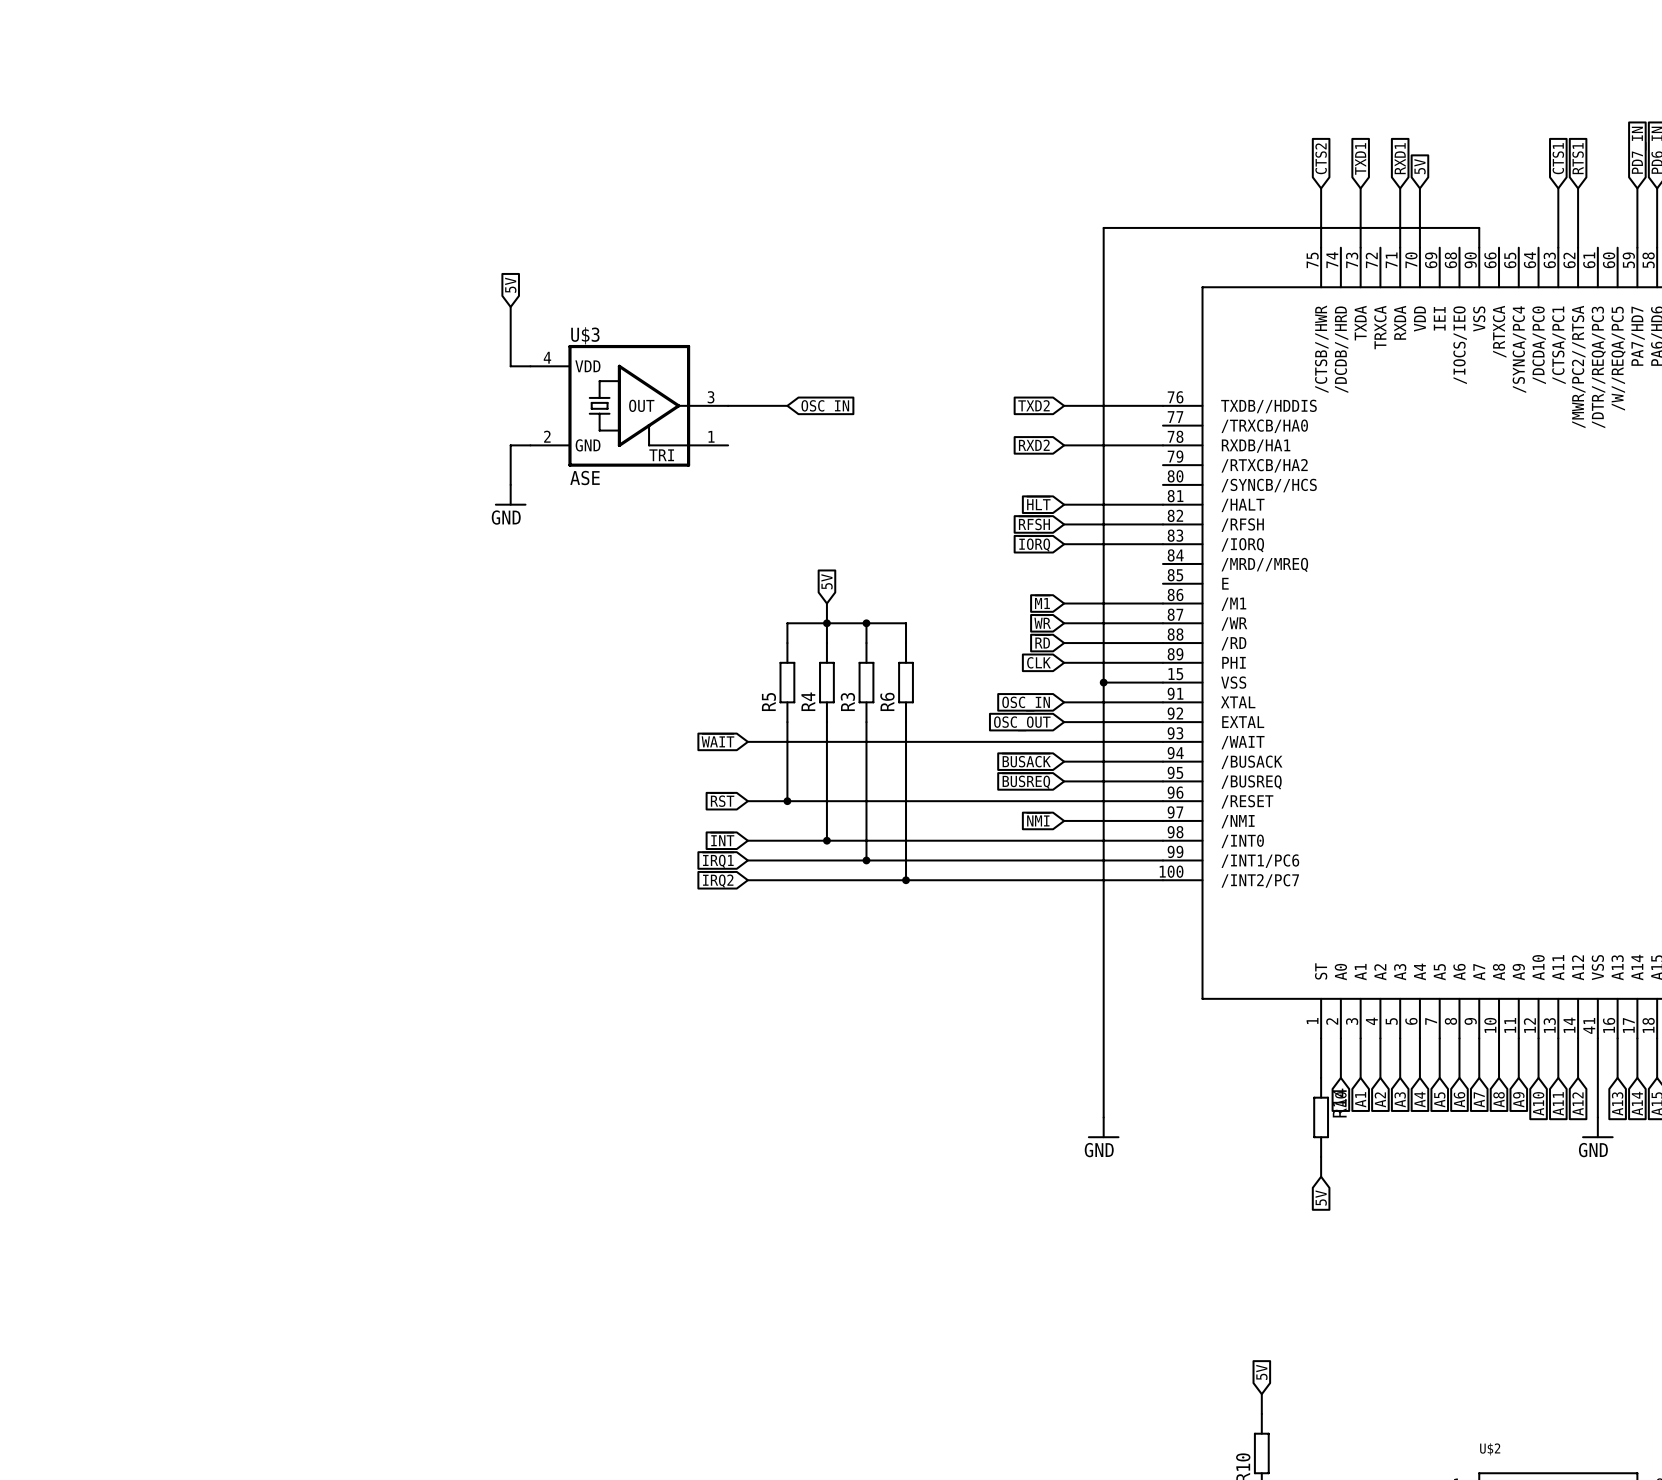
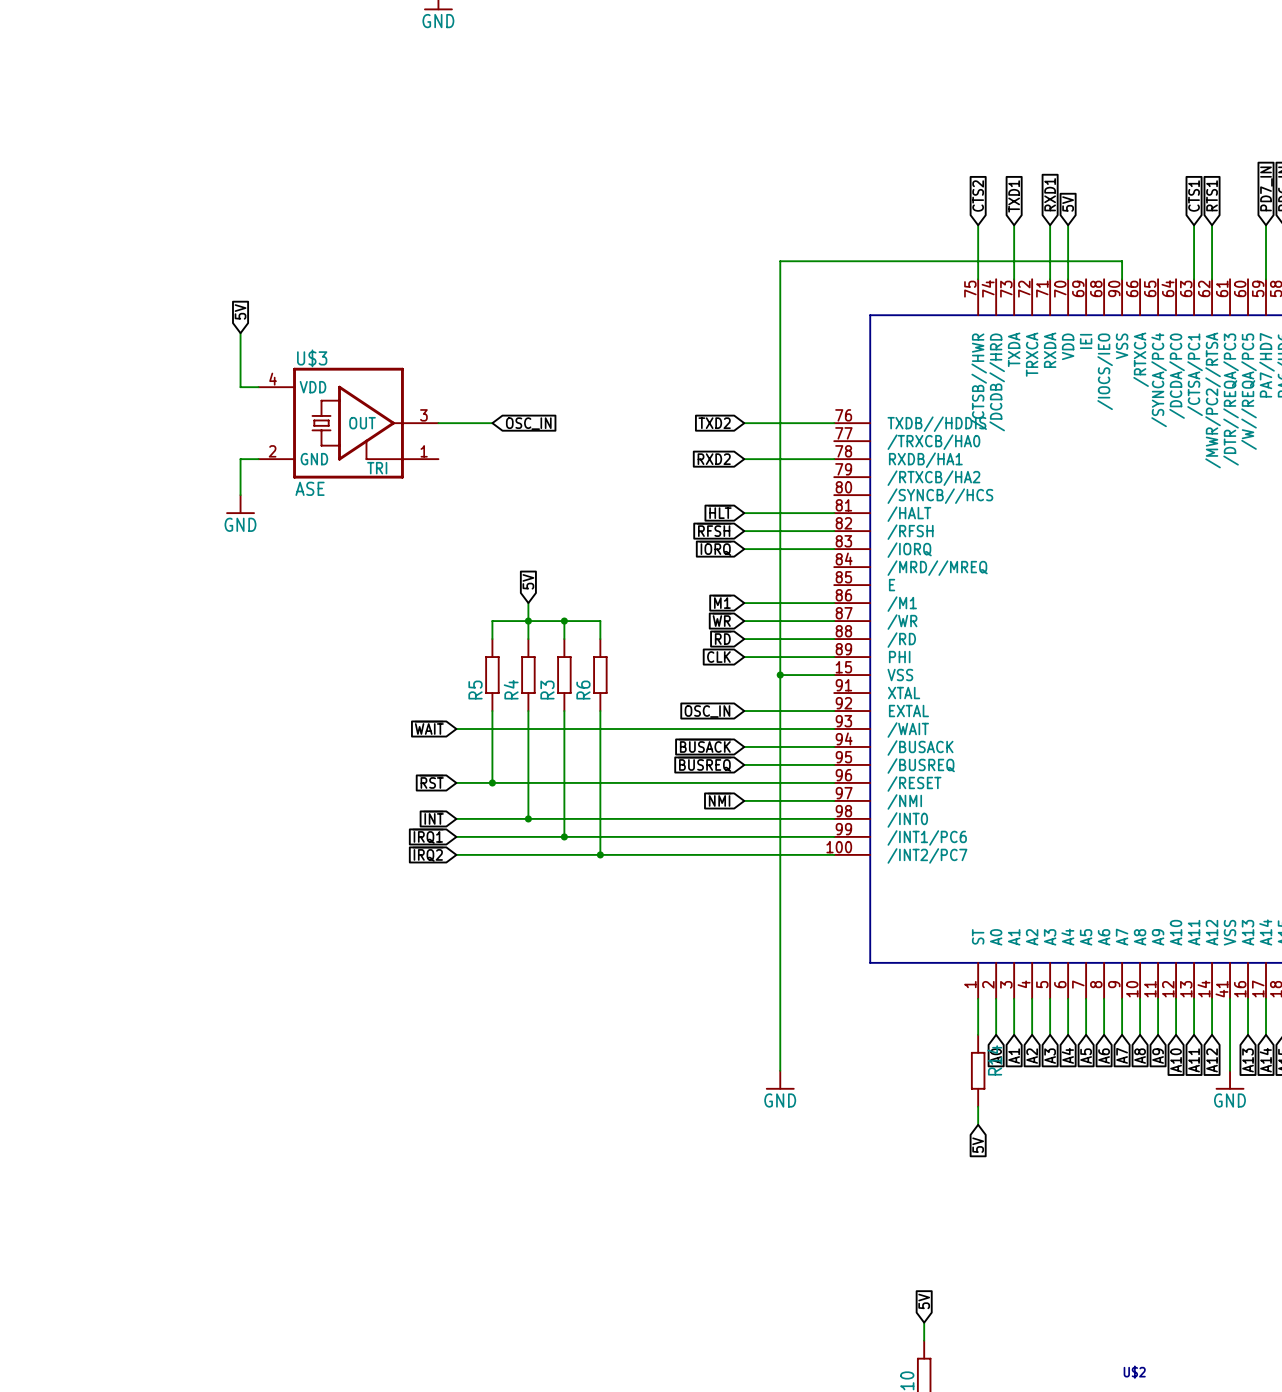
wire: (1064, 702) (1162, 702) -> none
global label: OSC_IN (1026, 704) -> none
global label: OSC_OUT (1022, 723) -> OSC_IN (707, 711)

